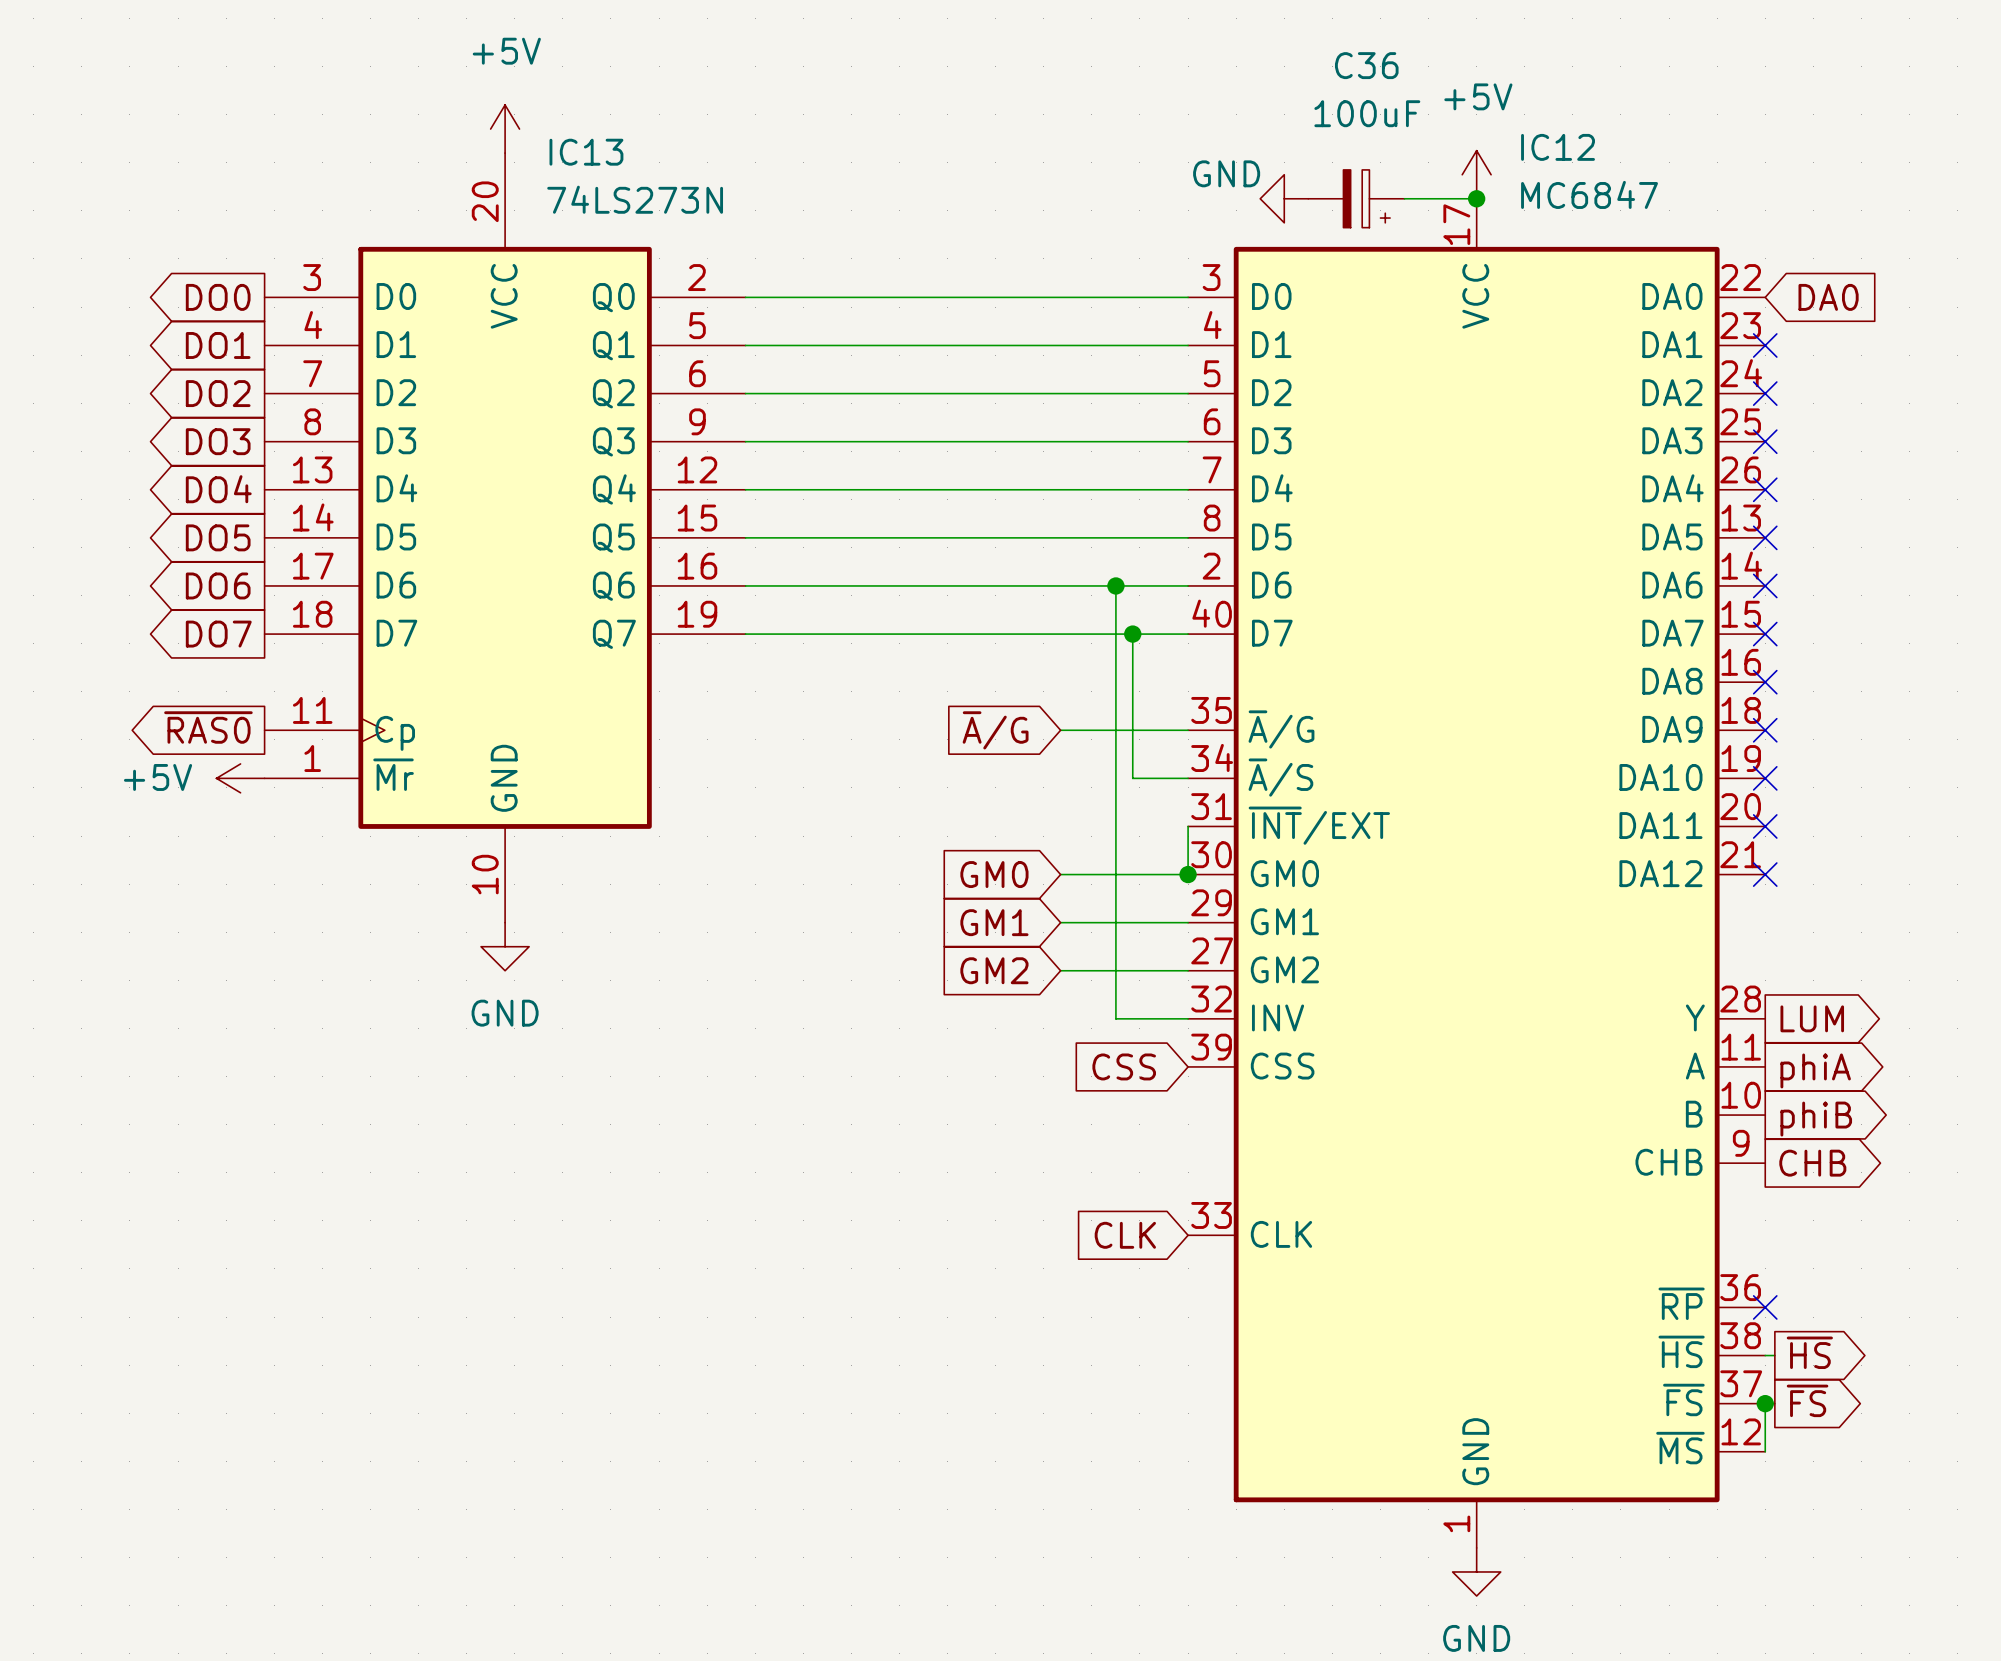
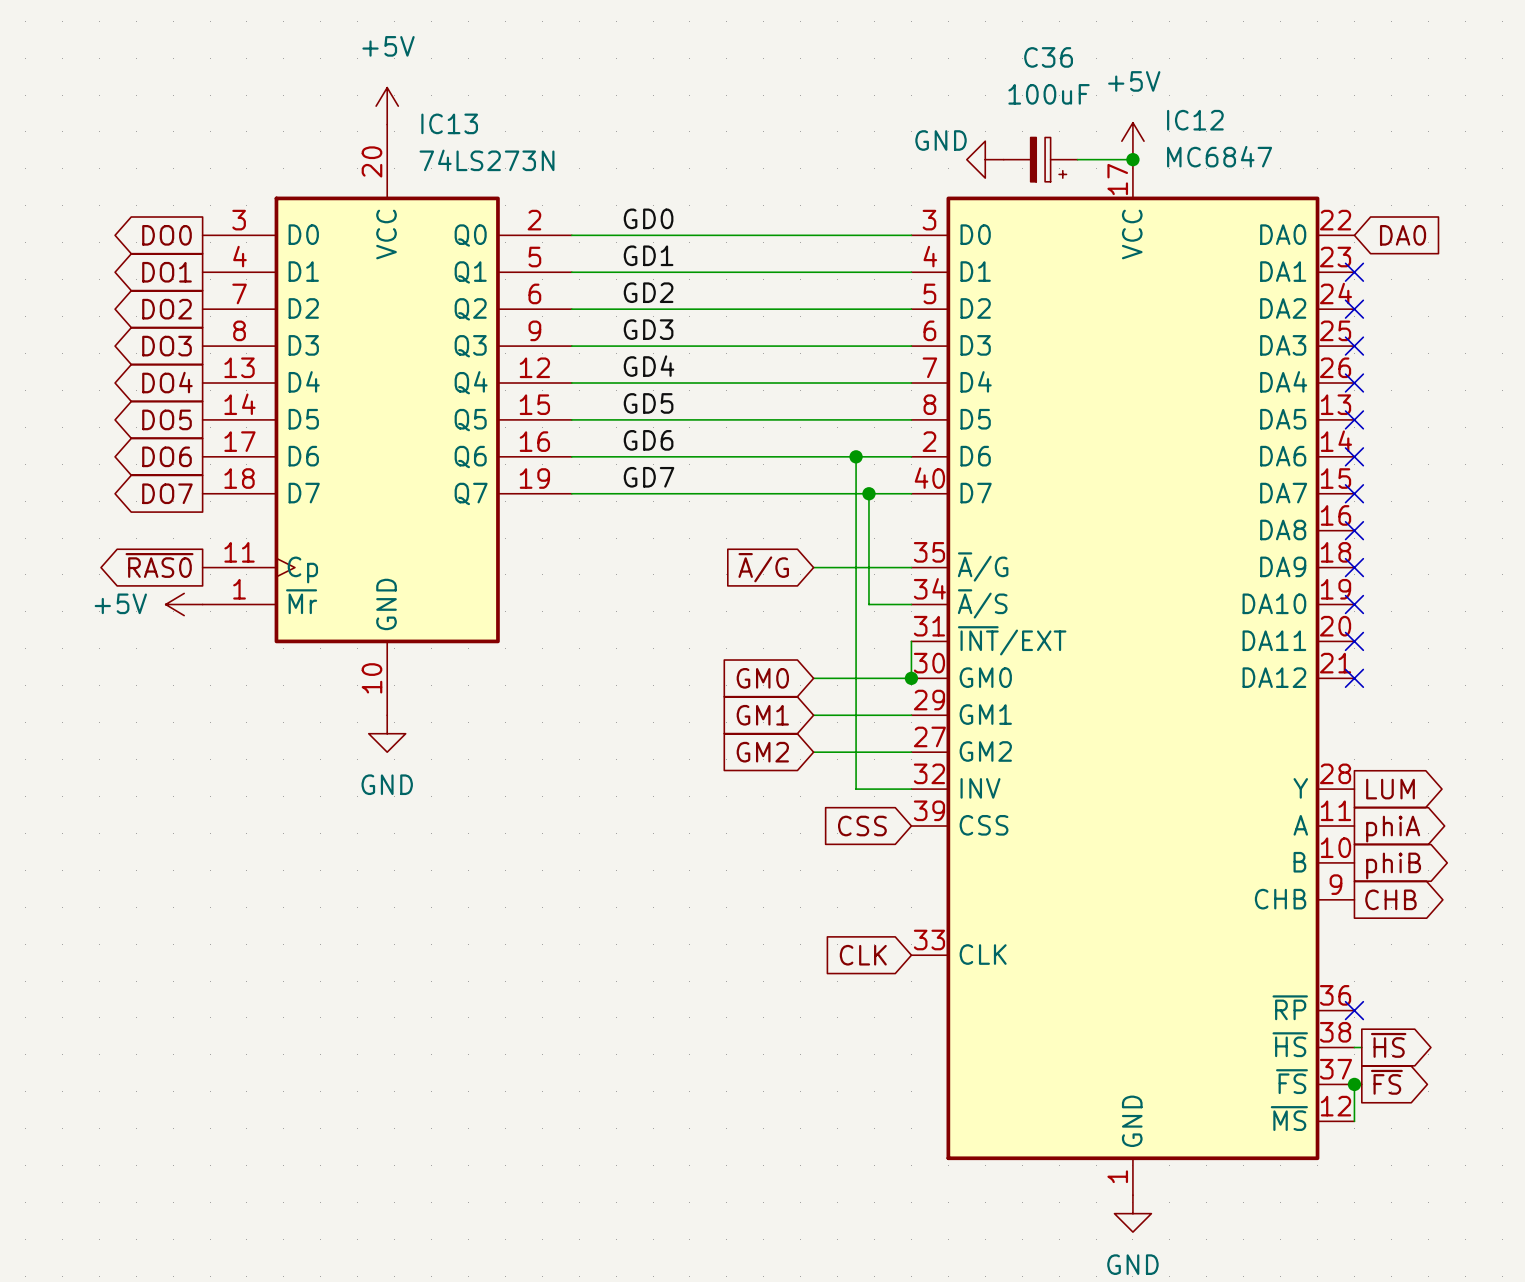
label: none -> GD0 (648, 218)
label: none -> GD1 (648, 255)
label: none -> GD2 (648, 292)
label: none -> GD3 (648, 329)
label: none -> GD4 (649, 366)
label: none -> GD5 (648, 403)
label: none -> GD6 (648, 440)
label: none -> GD7 (649, 477)

